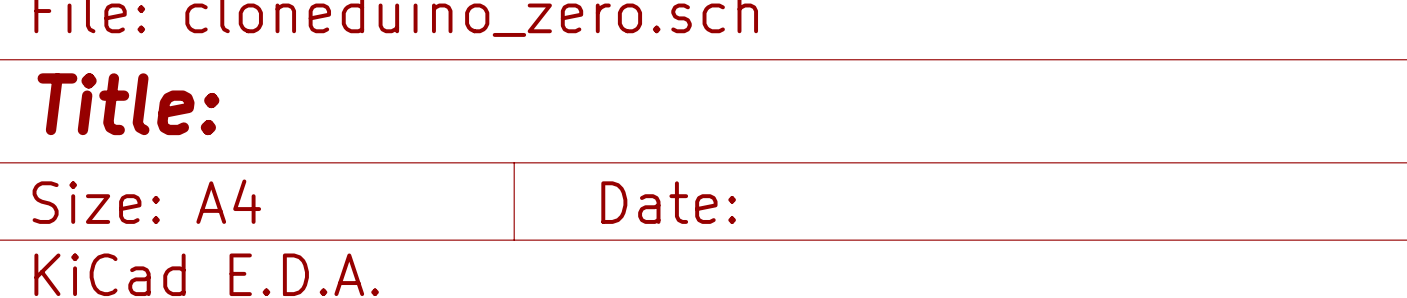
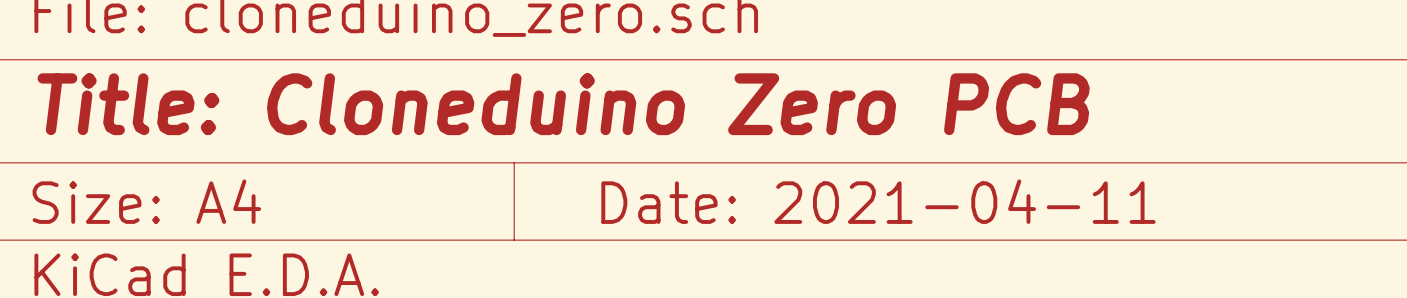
title block: Title: (128, 104) -> Title: Cloneduino Zero PCB (563, 104)
title block: Date: (668, 202) -> Date: 2021-04-11 (878, 201)

